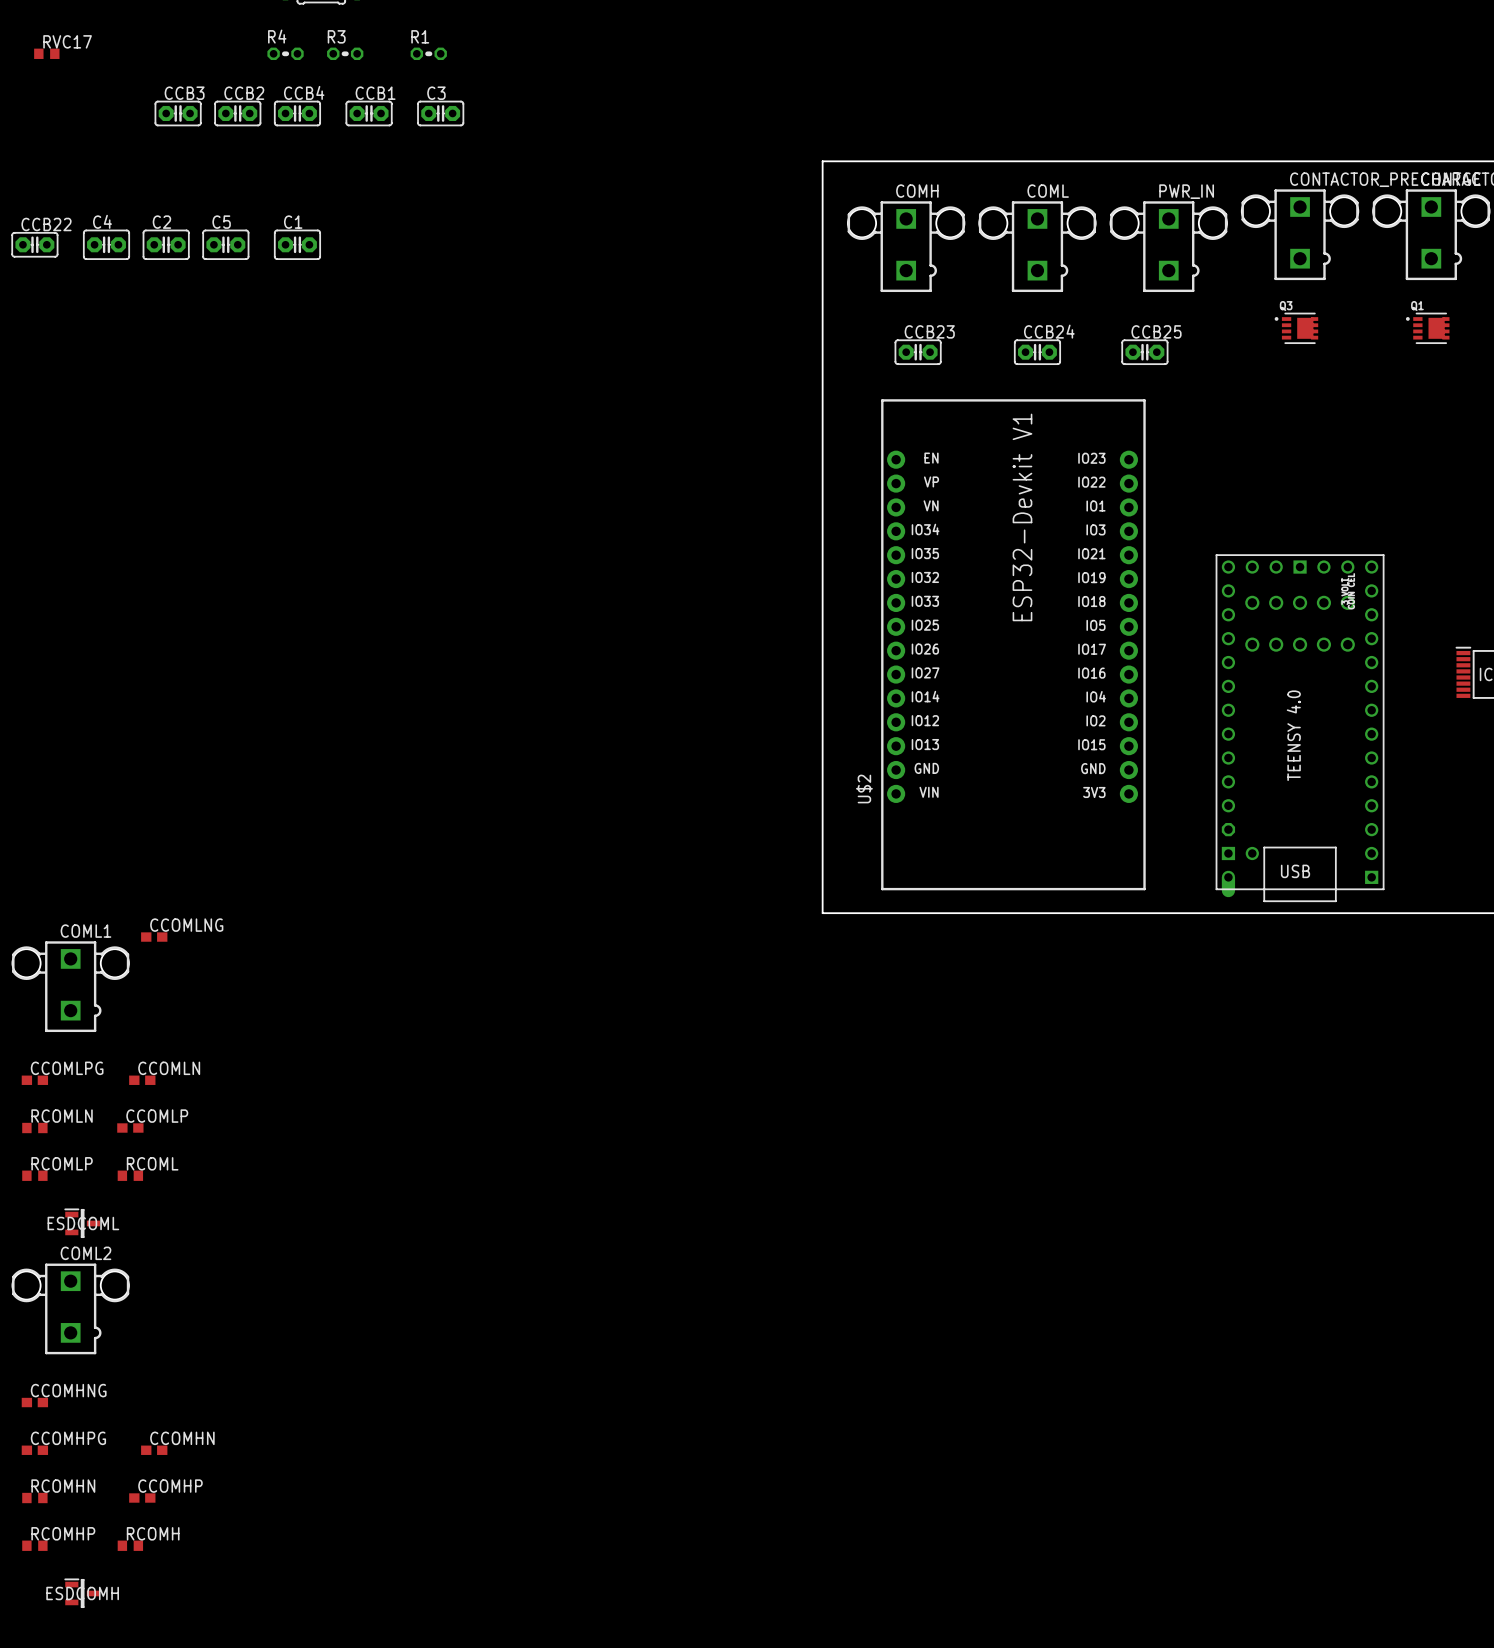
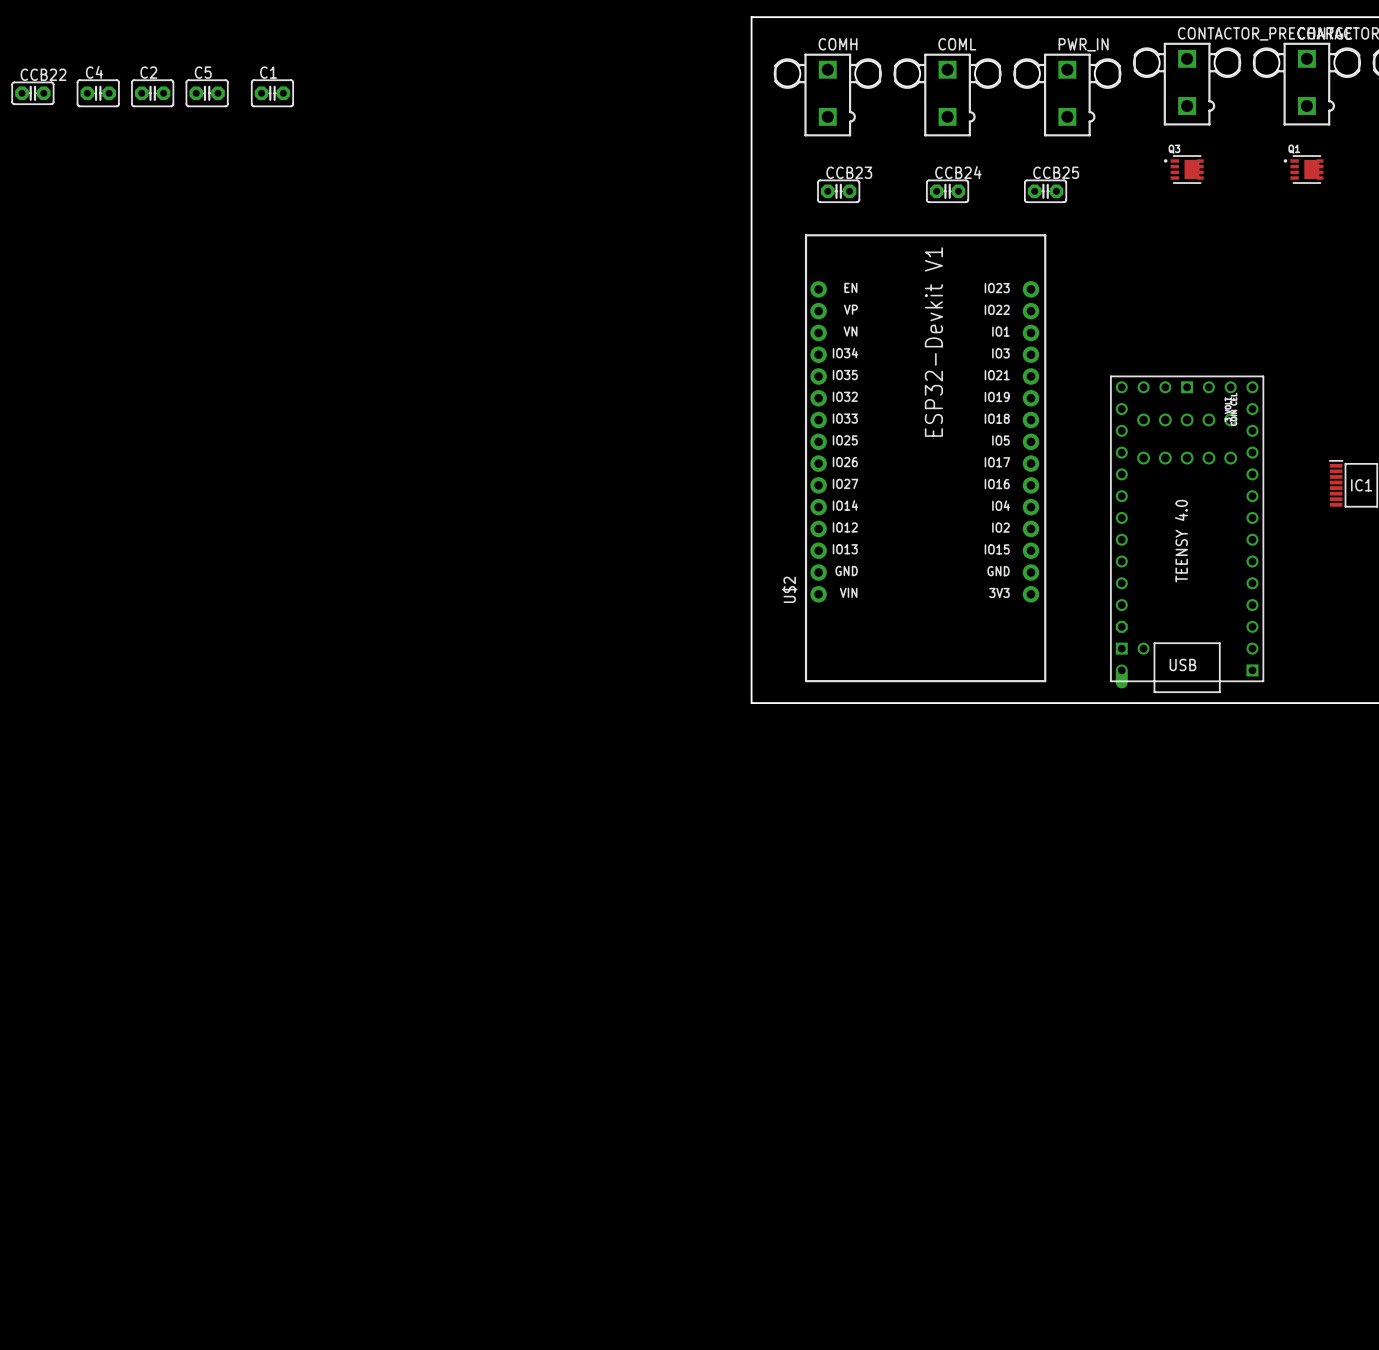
CCOMLNG: (154, 937) -> none
COML1: (70, 986) -> none
CCOMLPG: (34, 1080) -> none
CCOMLN: (142, 1080) -> none
RCOMLN: (34, 1128) -> none
CCOMLP: (130, 1128) -> none
RCOMLP: (34, 1175) -> none
RCOML: (130, 1175) -> none
ESDCOML: (82, 1223) -> none
COML2: (70, 1308) -> none
CCOMHNG: (34, 1402) -> none
CCOMHPG: (34, 1450) -> none
CCOMHN: (154, 1450) -> none
RCOMHN: (34, 1498) -> none
CCOMHP: (142, 1498) -> none
RCOMHP: (34, 1545) -> none
RCOMH: (130, 1545) -> none
ESDCOMH: (82, 1593) -> none

